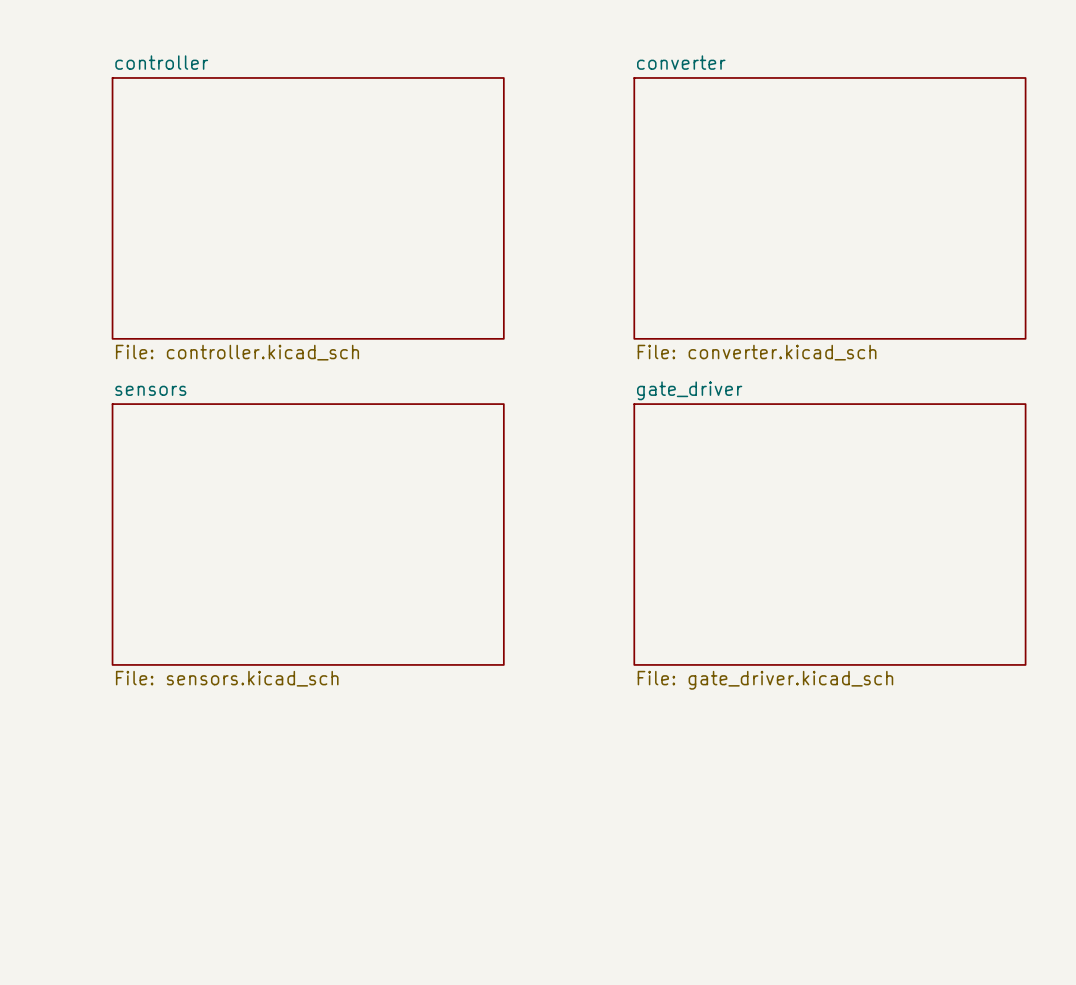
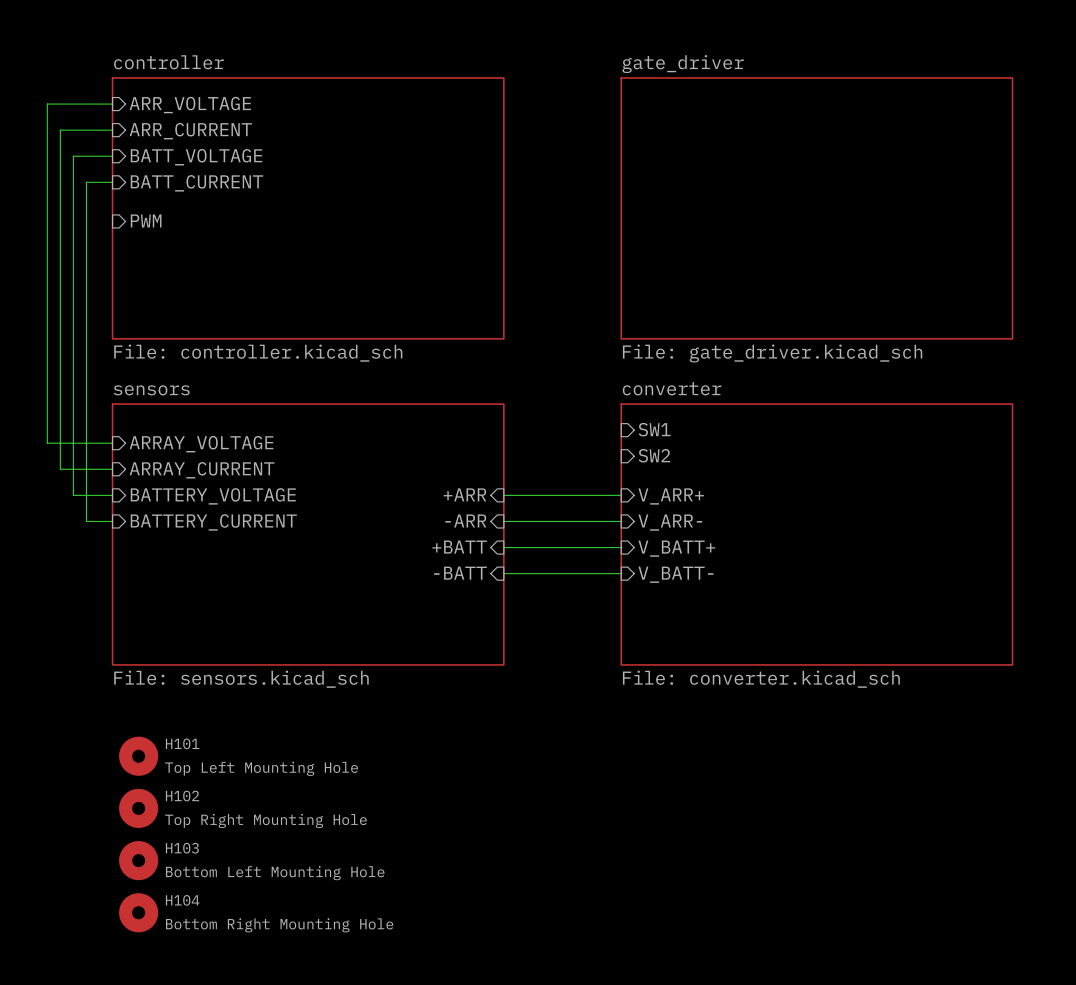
wire: none -> (112, 104) (47, 104) (47, 443) (112, 443)
sheet pin: none -> ARR_VOLTAGE (190, 105)
wire: none -> (112, 130) (60, 130) (60, 469) (112, 469)
sheet pin: none -> ARR_CURRENT (190, 131)
wire: none -> (112, 156) (73, 156) (73, 495) (112, 495)
sheet pin: none -> BATT_VOLTAGE (196, 157)
wire: none -> (112, 182) (86, 182) (86, 521) (112, 521)
sheet pin: none -> BATT_CURRENT (196, 183)
sheet gate_driver: none -> File: gate_driver.kicad_sch (816, 208)
sheet converter: File: converter.kicad_sch (829, 208) -> none
sheet pin: none -> PWM (146, 220)
sheet pin: none -> SW1 (654, 429)
sheet pin: none -> ARRAY_VOLTAGE (201, 444)
sheet pin: none -> SW2 (654, 455)
sheet pin: none -> ARRAY_CURRENT (202, 470)
sheet pin: none -> +ARR (464, 494)
sheet pin: none -> BATTERY_VOLTAGE (213, 496)
wire: none -> (503, 495) (621, 495)
sheet pin: none -> V_ARR+ (671, 496)
sheet pin: none -> -ARR (465, 520)
sheet pin: none -> BATTERY_CURRENT (213, 522)
wire: none -> (503, 521) (621, 521)
sheet pin: none -> V_ARR- (670, 522)
sheet converter: none -> File: converter.kicad_sch (816, 534)
sheet gate_driver: File: gate_driver.kicad_sch (829, 534) -> none
sheet pin: none -> +BATT (459, 547)
wire: none -> (503, 547) (621, 547)
sheet pin: none -> V_BATT+ (676, 548)
sheet pin: none -> -BATT (460, 573)
wire: none -> (503, 573) (621, 573)
sheet pin: none -> V_BATT- (675, 574)
H101: none -> Top Left Mounting Hole (138, 756)
H102: none -> Top Right Mounting Hole (138, 808)
H103: none -> Bottom Left Mounting Hole (138, 860)
H104: none -> Bottom Right Mounting Hole (138, 912)

